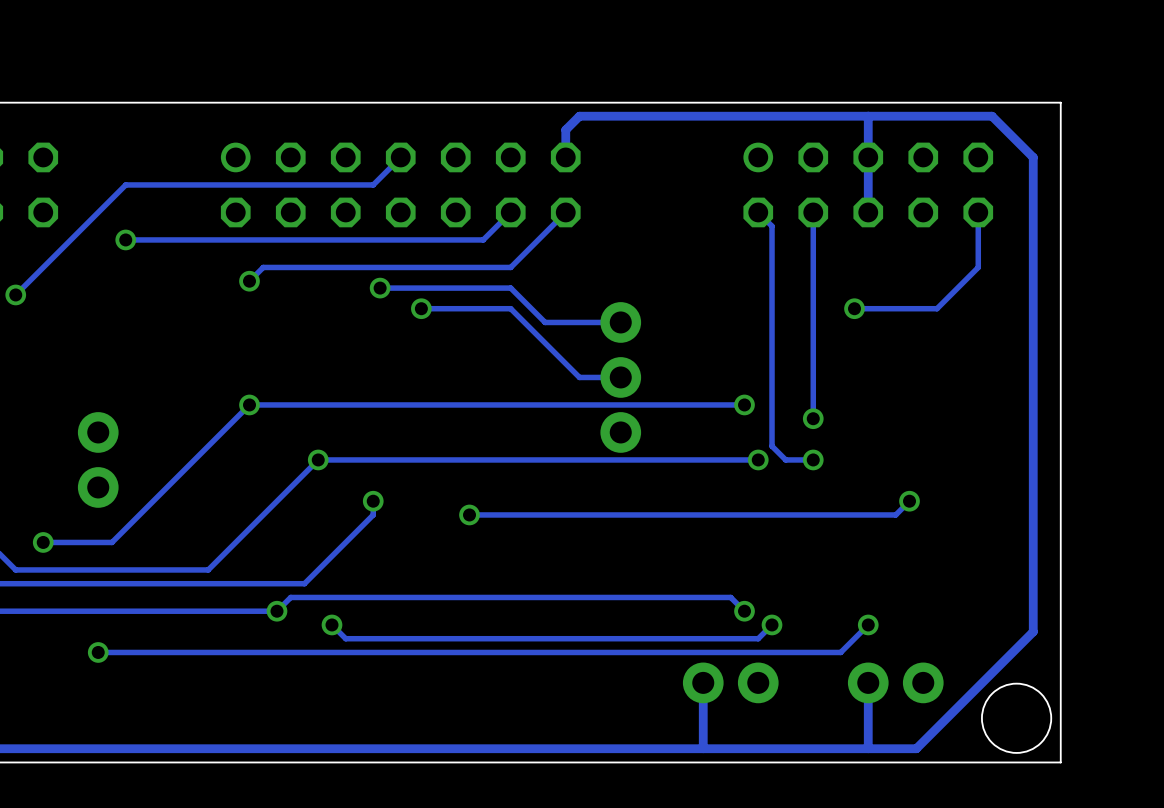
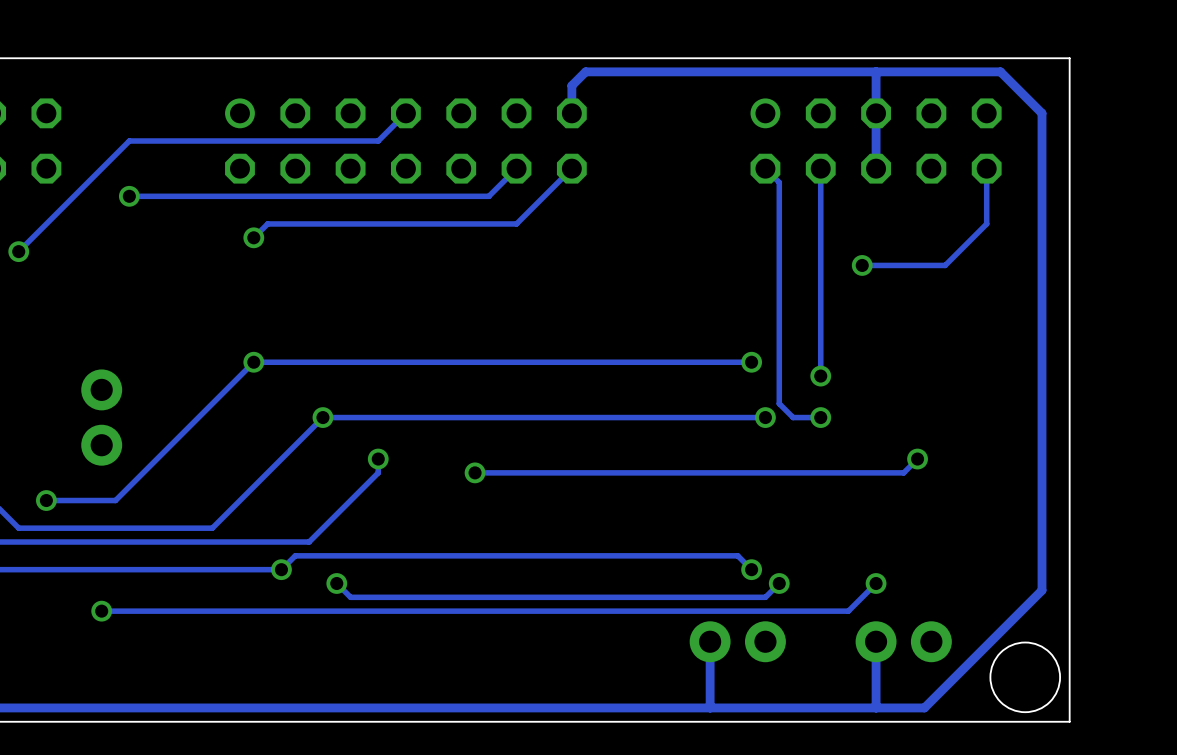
track: (380, 288) (510, 288) (545, 322) (620, 322) -> none
via: (380, 288) -> none
track: (421, 308) (510, 308) (579, 377) (620, 377) -> none
via: (421, 308) -> none
part: (620, 377) -> none

